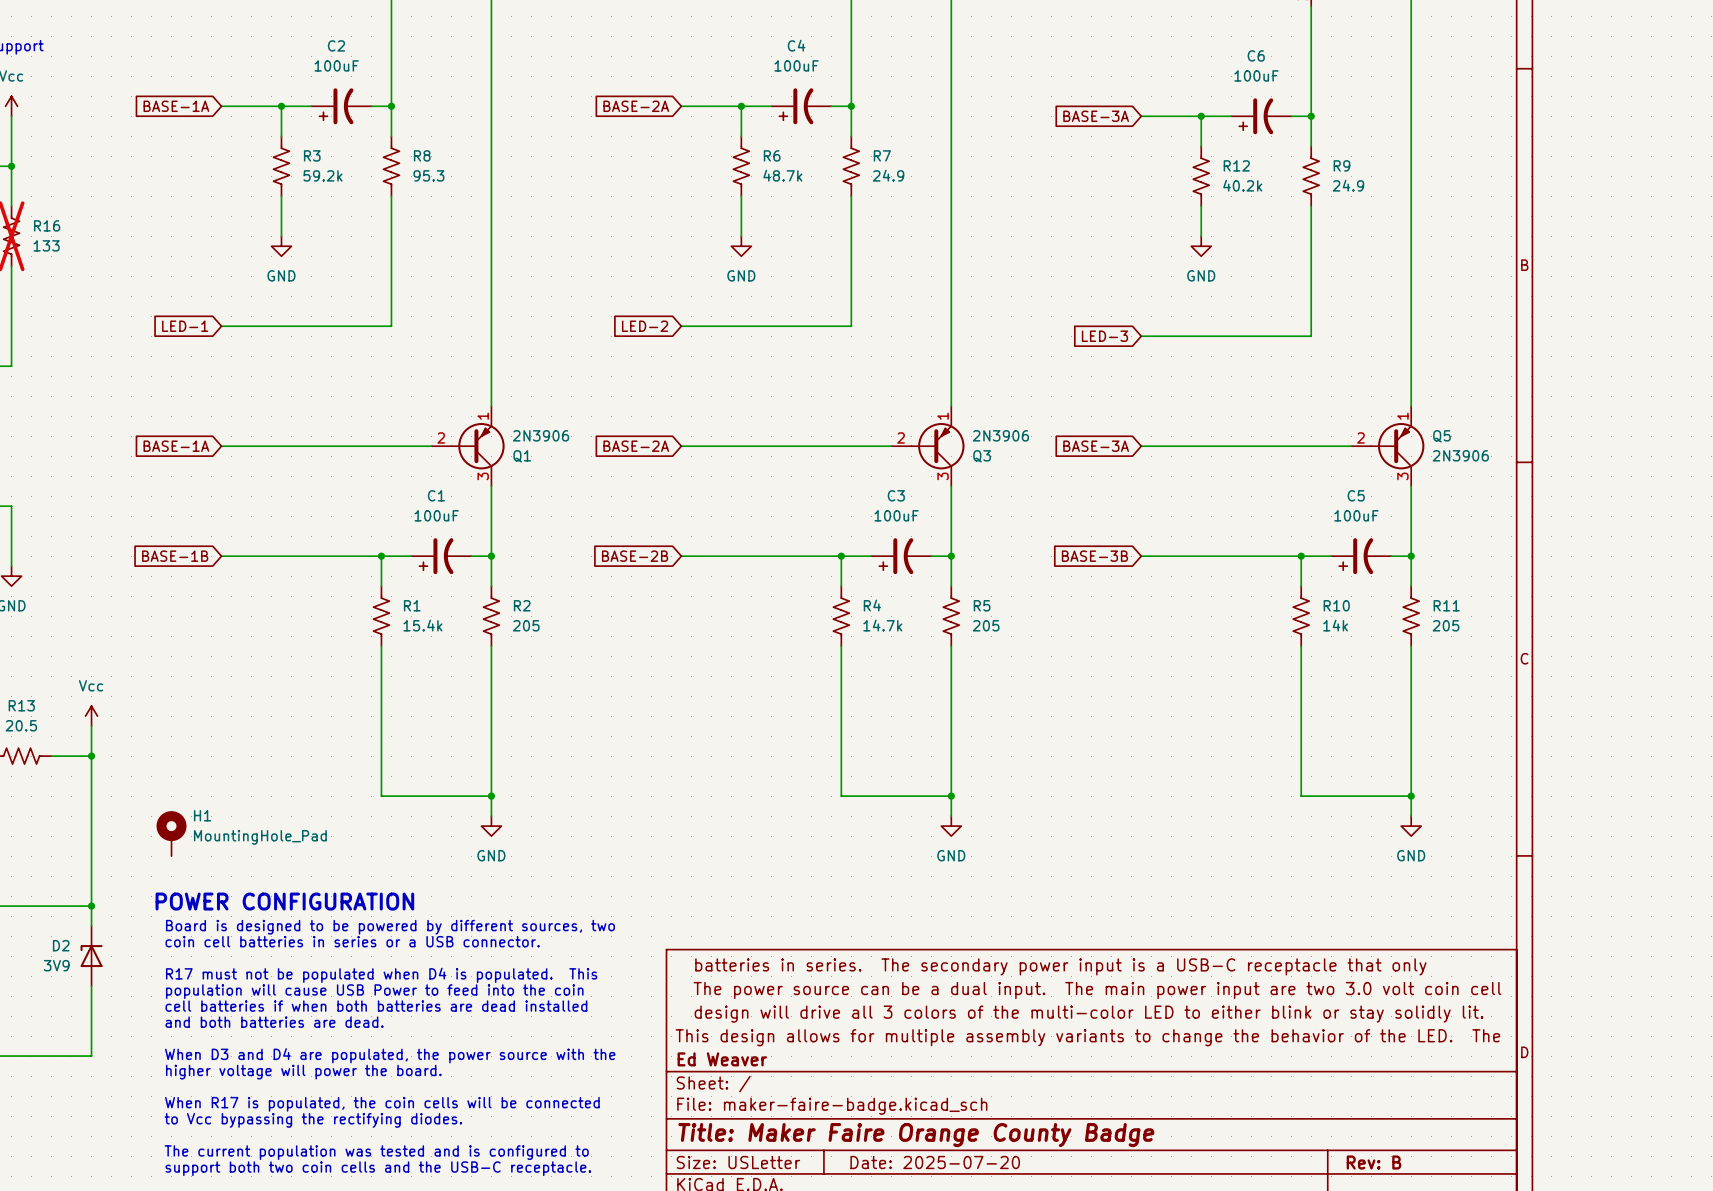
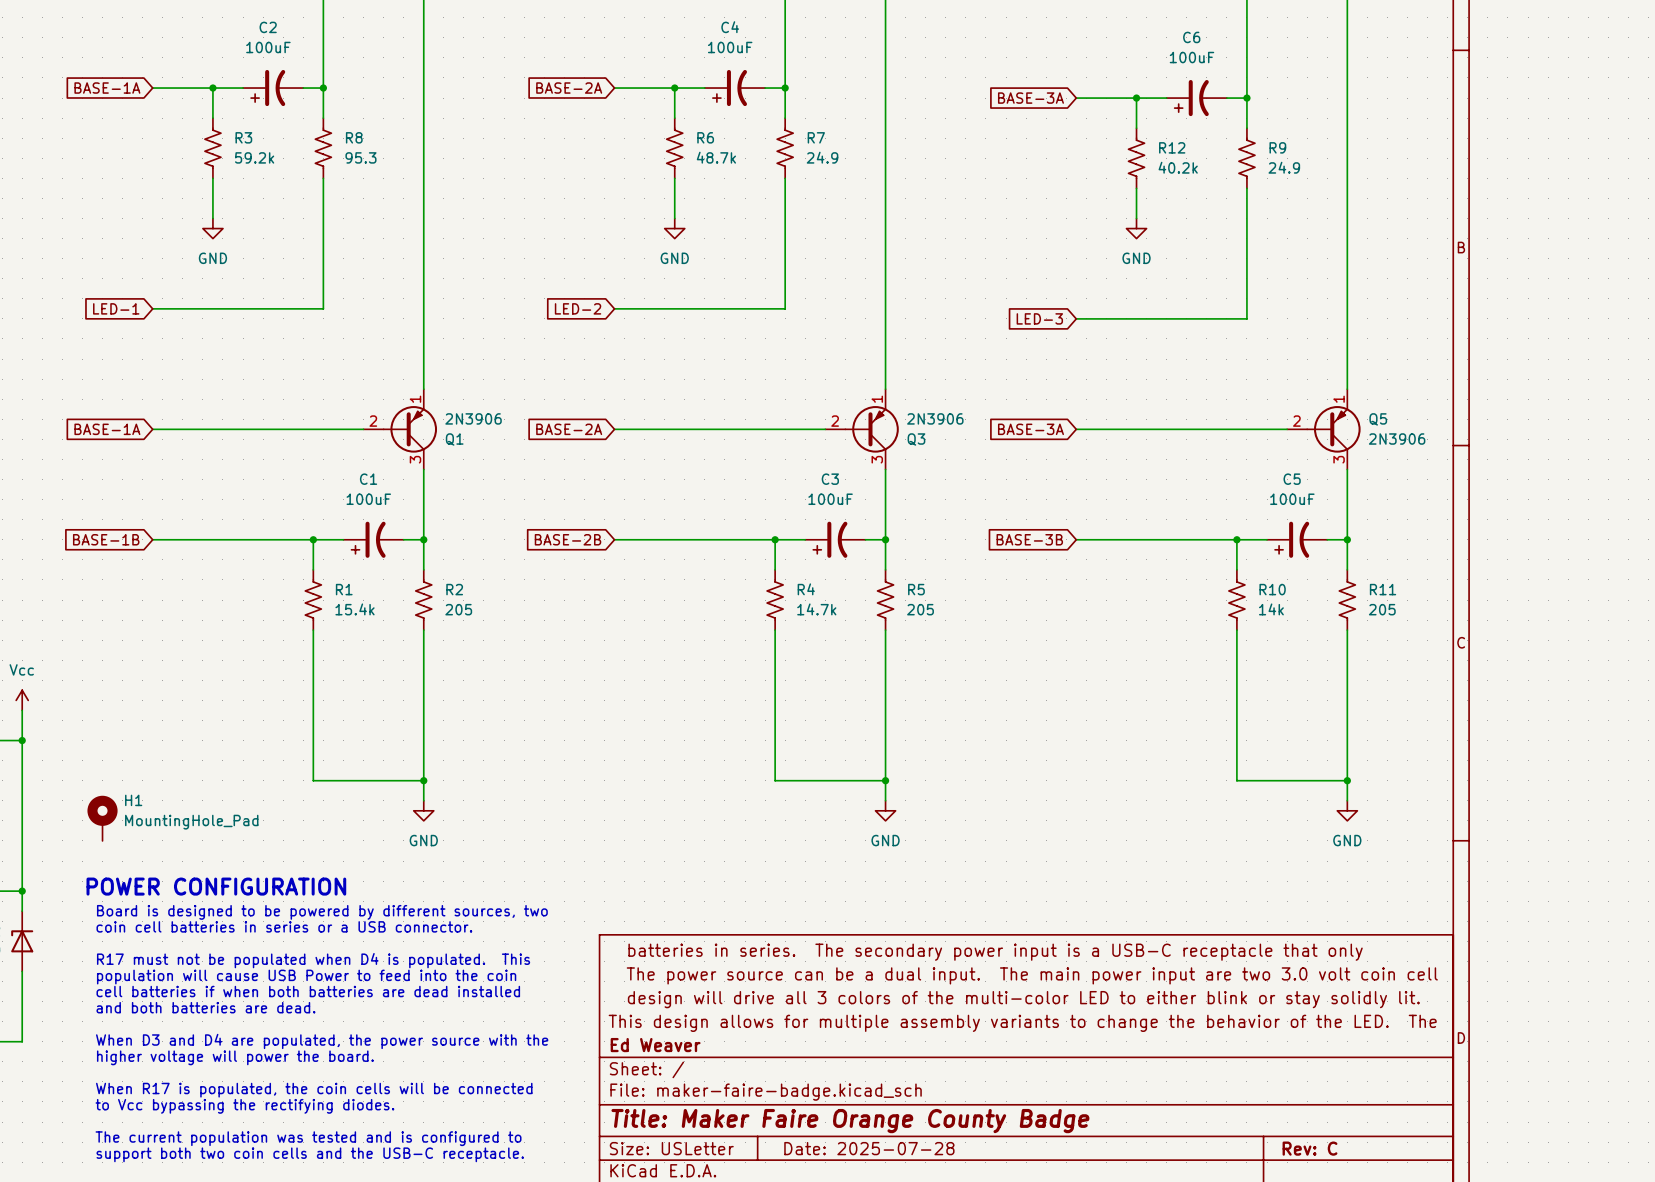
title block: Date: 2025-07-20 (935, 1162) -> Date: 2025-07-28 (869, 1148)
title block: Rev: B (1374, 1162) -> Rev: C (1309, 1148)

